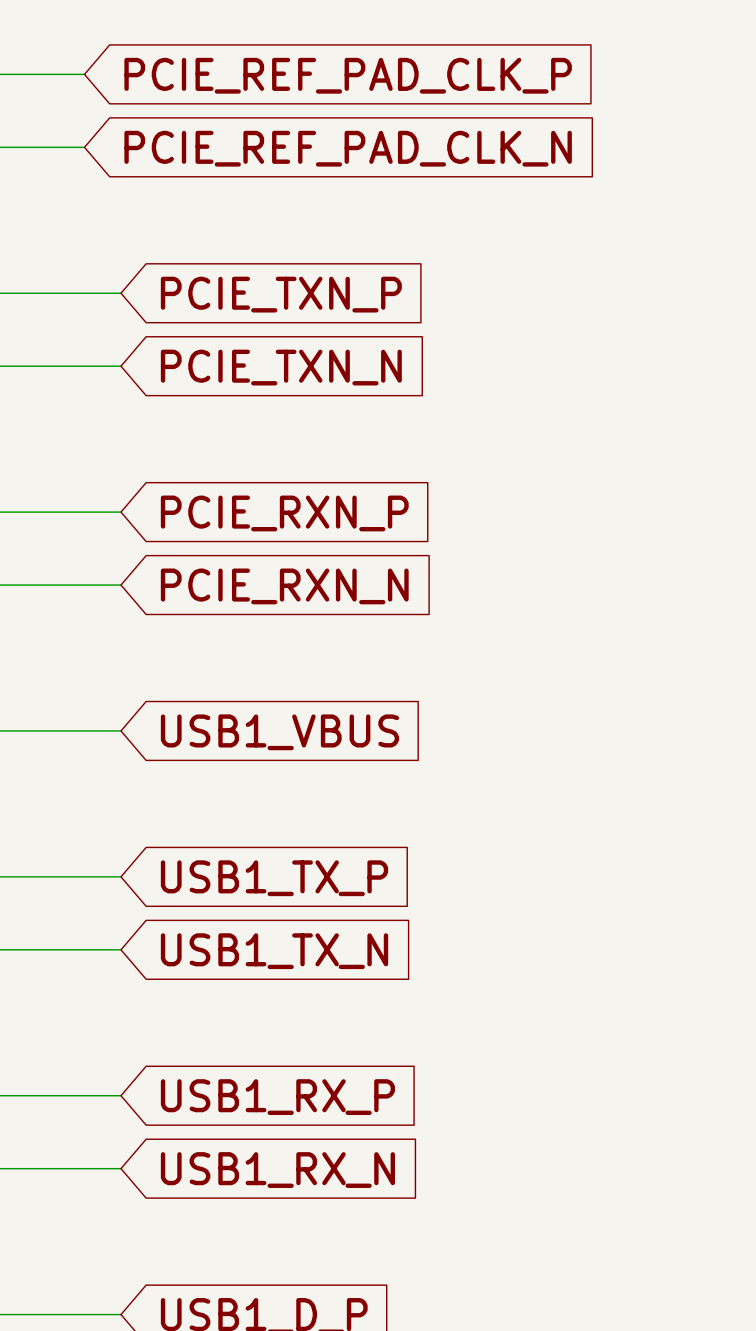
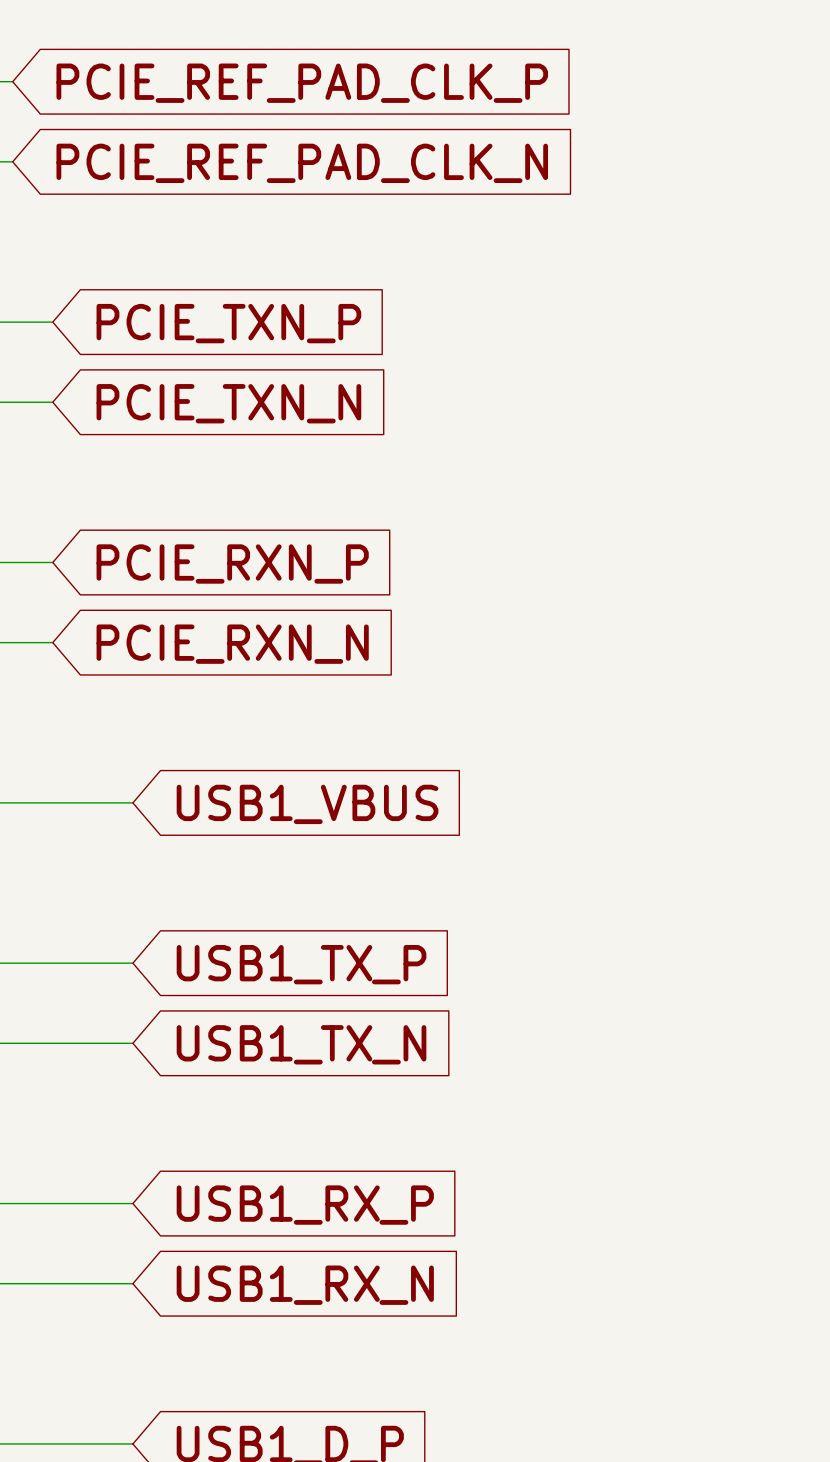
wire: (11, 74) (84, 74) -> none
global label position: PCIE_REF_PAD_CLK_P (348, 75) -> PCIE_REF_PAD_CLK_P (302, 83)
wire: (11, 147) (84, 147) -> none
global label position: PCIE_REF_PAD_CLK_N (348, 148) -> PCIE_REF_PAD_CLK_N (302, 163)
wire: (48, 293) (121, 293) -> none
global label position: PCIE_TXN_P (281, 294) -> PCIE_TXN_P (228, 323)
wire: (48, 366) (121, 366) -> none
global label position: PCIE_TXN_N (281, 367) -> PCIE_TXN_N (228, 403)
wire: (48, 512) (121, 512) -> none
global label position: PCIE_RXN_P (284, 513) -> PCIE_RXN_P (232, 564)
wire: (48, 585) (121, 585) -> none
global label position: PCIE_RXN_N (284, 586) -> PCIE_RXN_N (232, 644)

